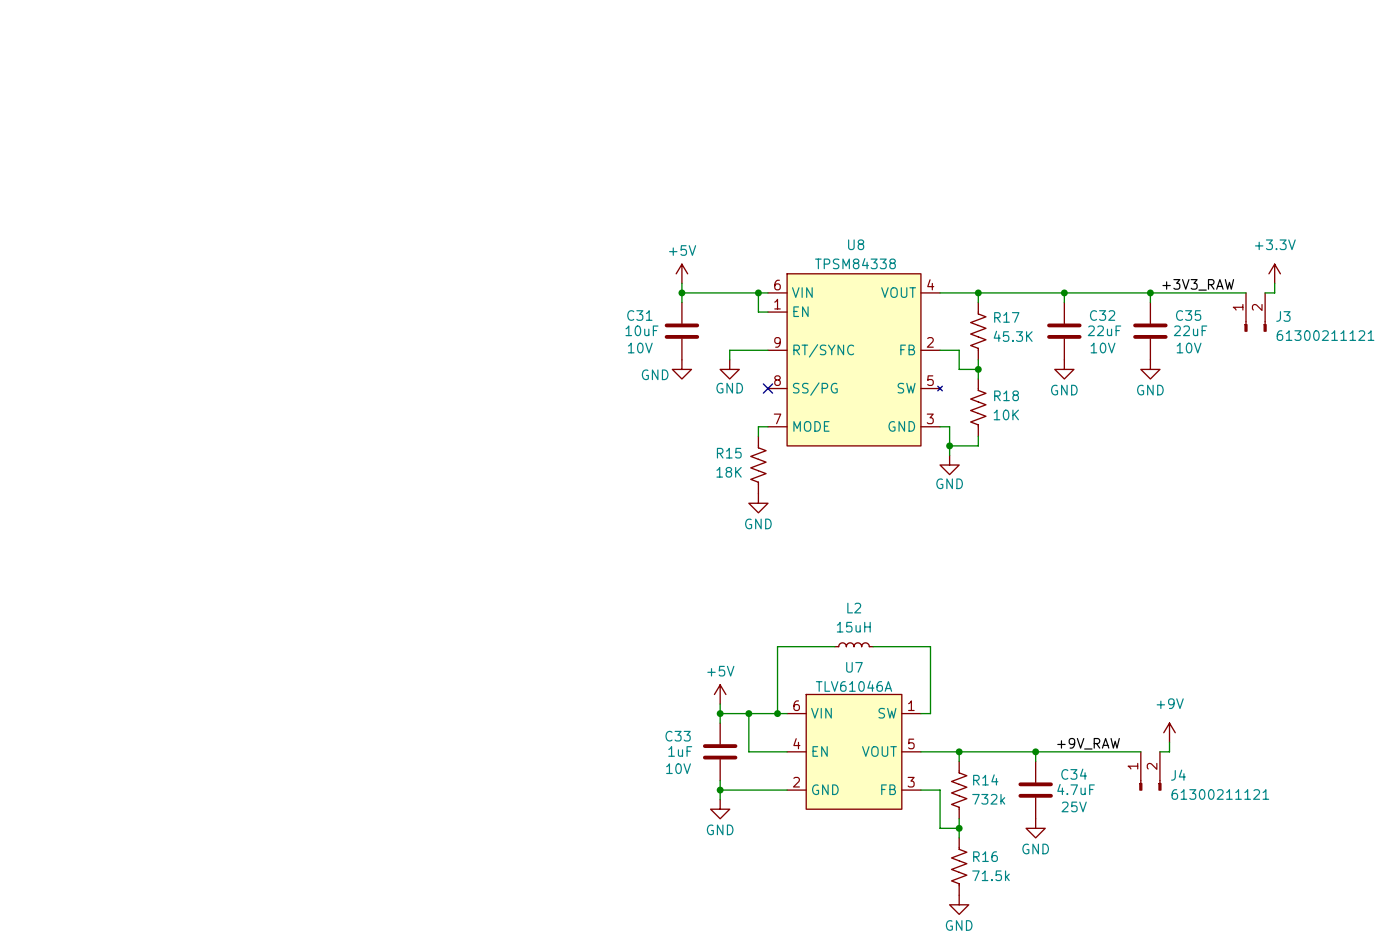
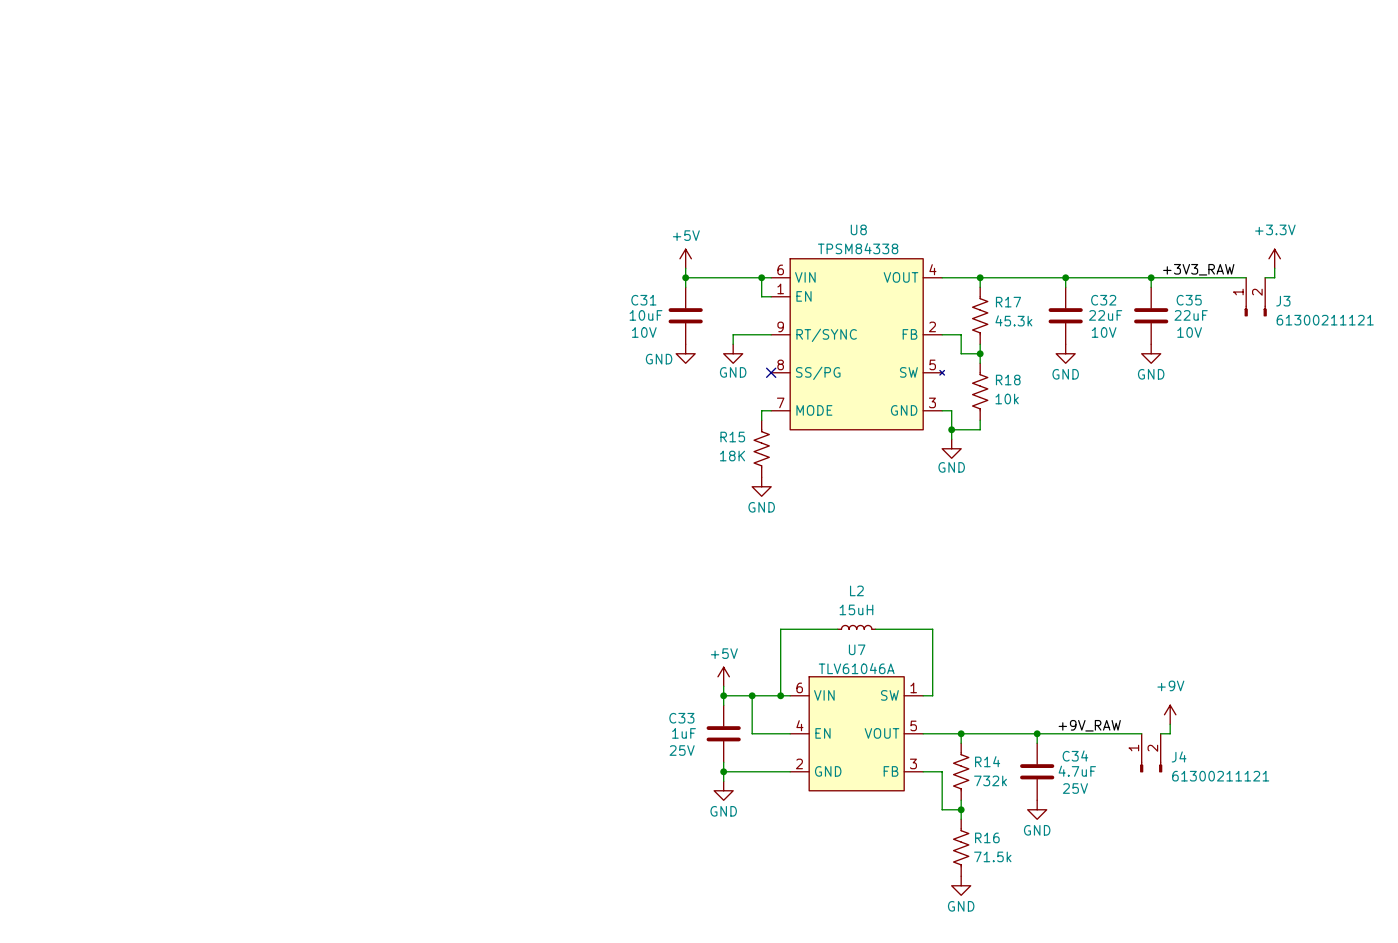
R17 value: 45.3K (1013, 336) -> 45.3k (1013, 320)
R18 value: 10K (1006, 414) -> 10k (1007, 399)
C33 text: 10V (678, 768) -> 25V (682, 750)

